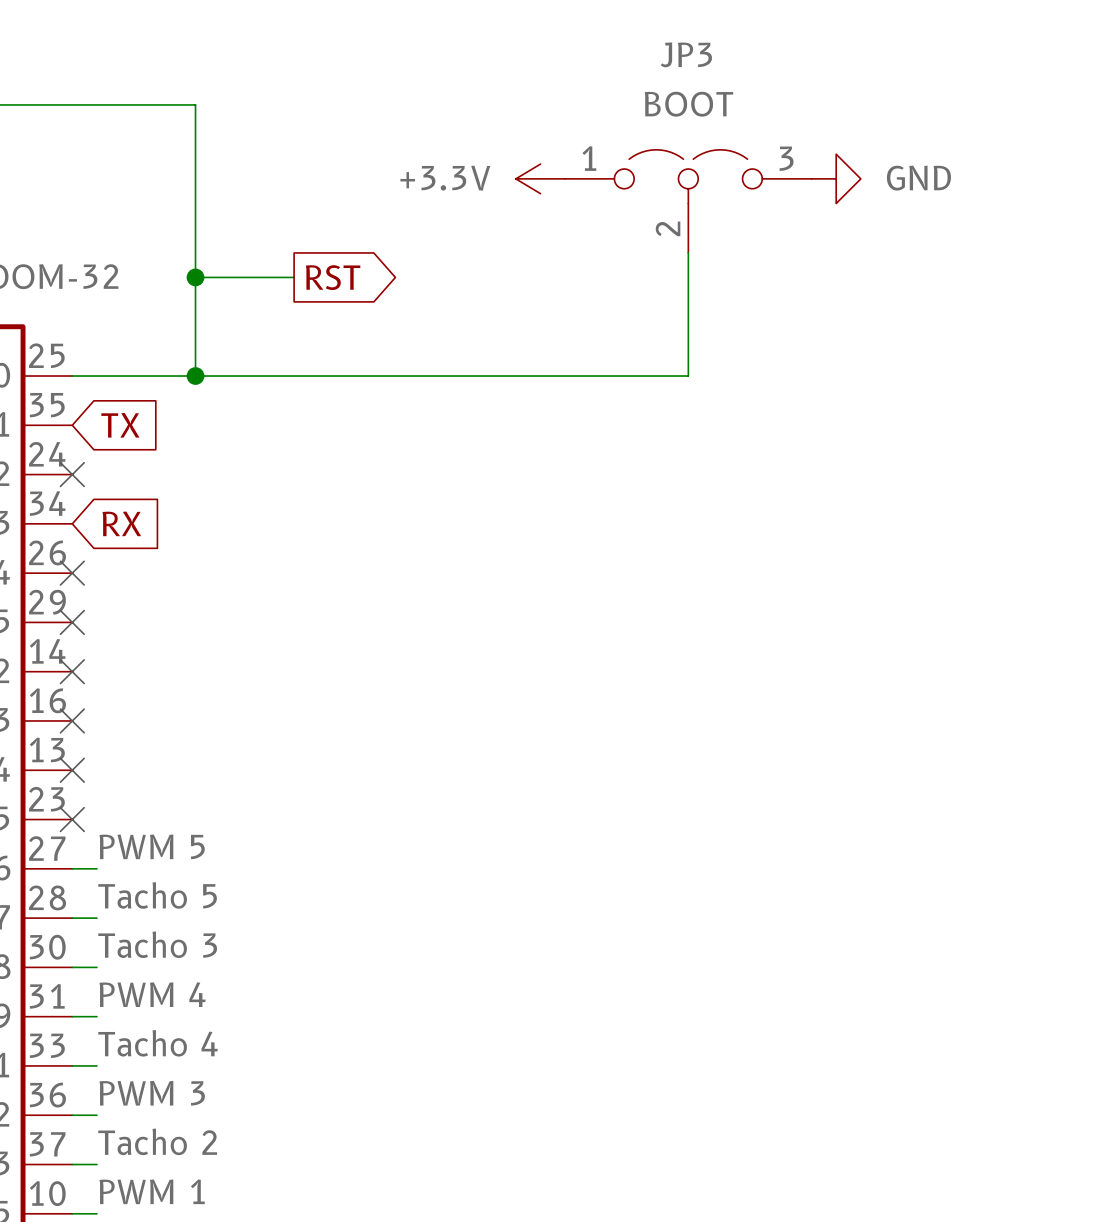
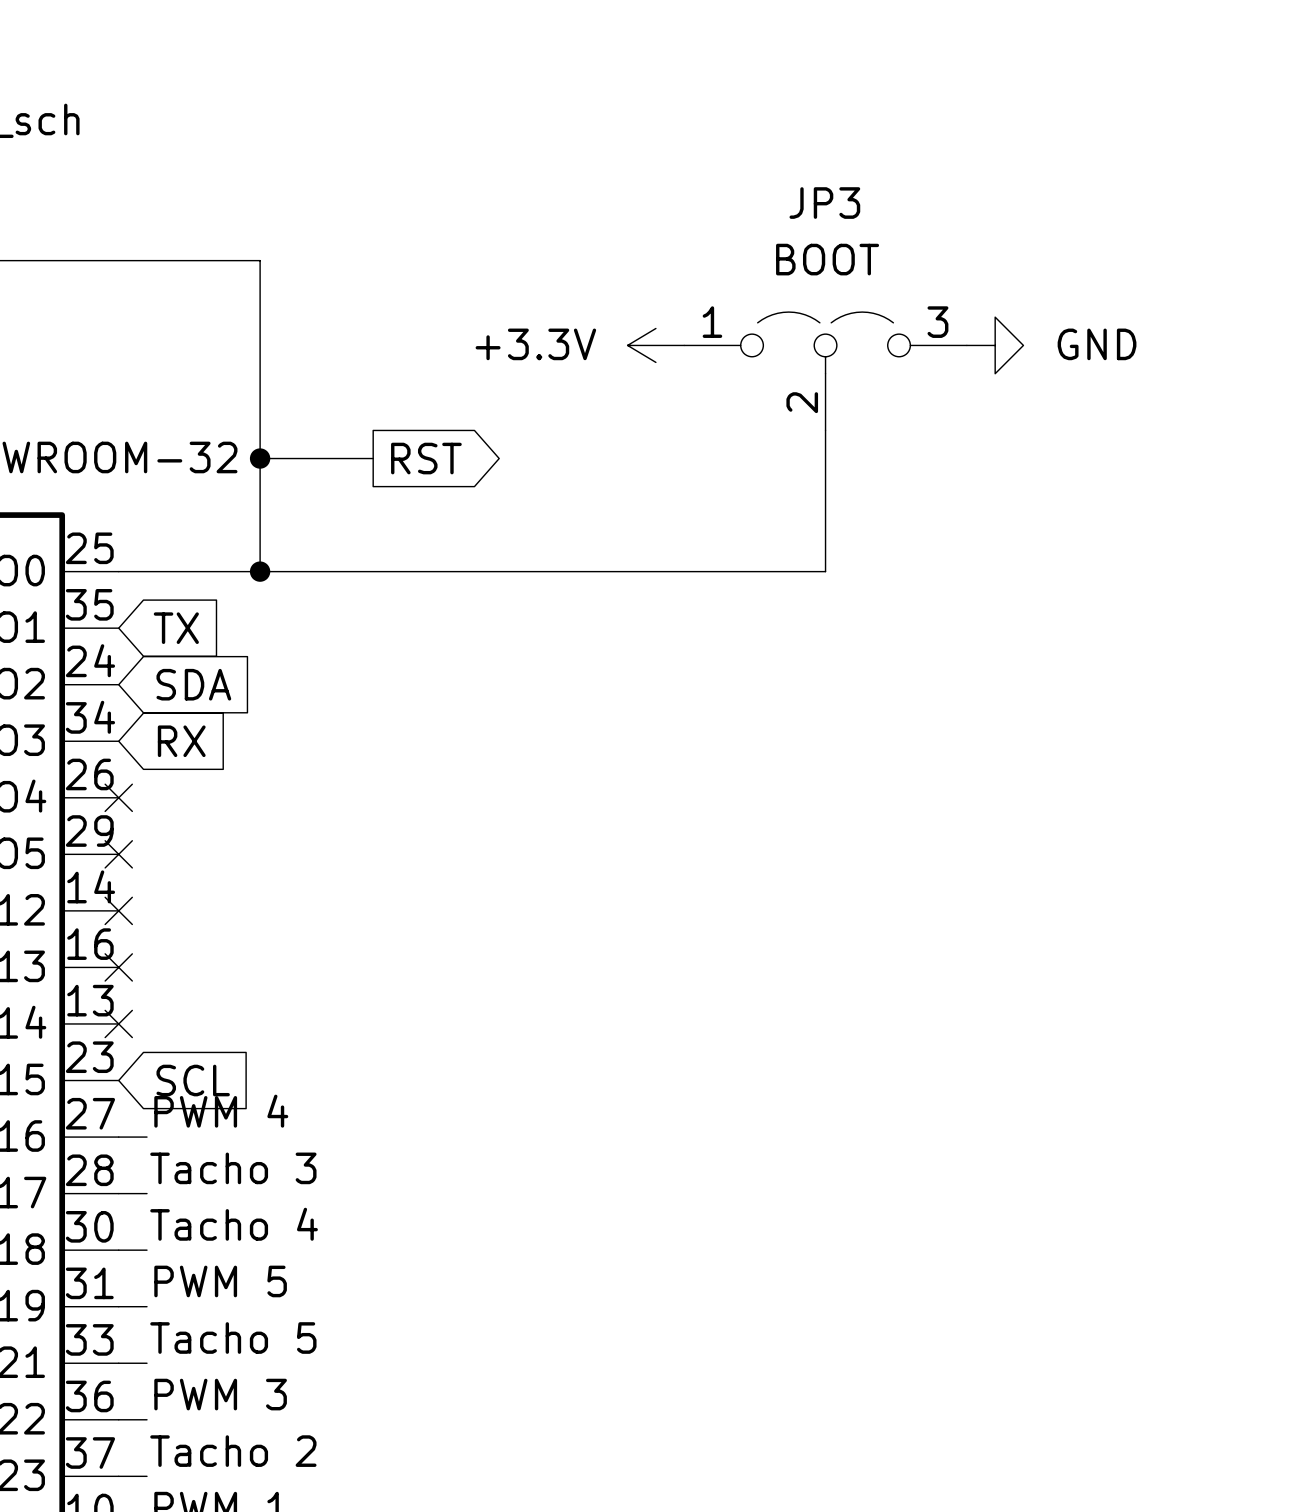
no-connect mark: (72, 474) -> none
global label: none -> SDA (193, 684)
no-connect mark: (72, 819) -> none
global label: none -> SCL (193, 1080)
label: PWM 5 (152, 846) -> PWM 4 (221, 1111)
label: Tacho 5 (157, 895) -> Tacho 3 (233, 1168)
label: Tacho 3 (157, 944) -> Tacho 4 (234, 1224)
label: PWM 4 (152, 994) -> PWM 5 (220, 1281)
label: Tacho 4 (158, 1043) -> Tacho 5 (233, 1338)

